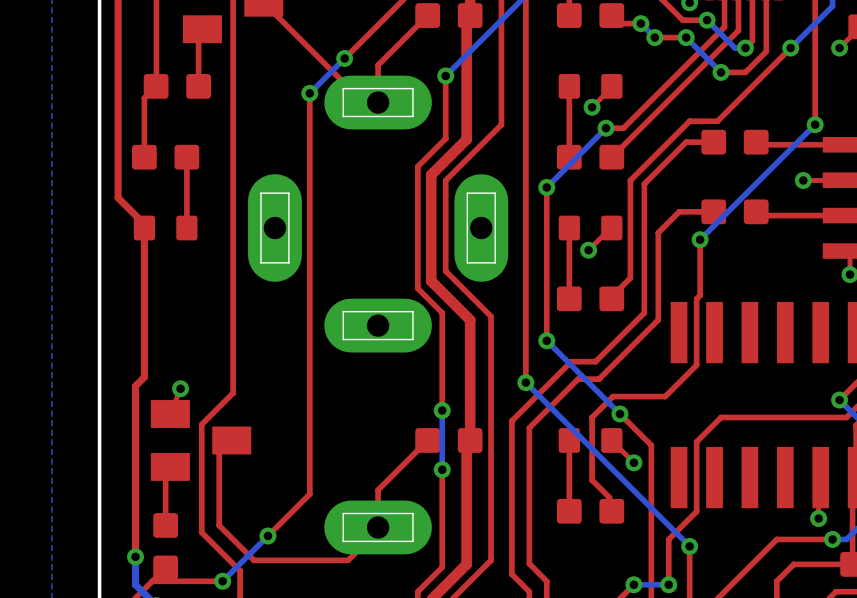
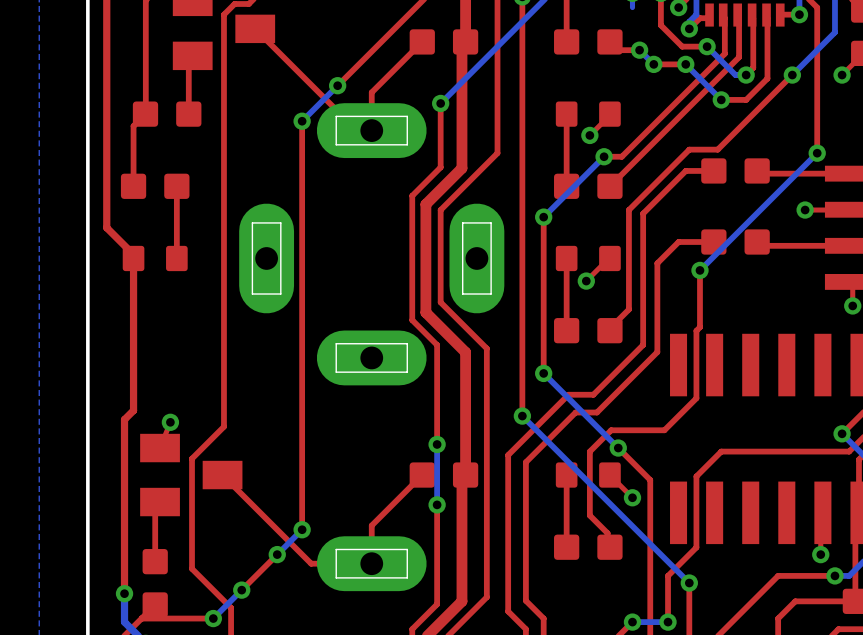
top track: (231, 440) (219, 453) (219, 525) (254, 560) (348, 560) (378, 530) (378, 527) -> (222, 475) (311, 563) (371, 563)
top track: (309, 494) (285, 518) -> none
bottom track: none -> (302, 529) (277, 554)
via: none -> (302, 529)
via: none -> (277, 554)
top track: none -> (259, 572) (241, 590)
bottom track: (267, 535) (250, 553) -> none
via: (267, 535) -> none
via: none -> (241, 590)

